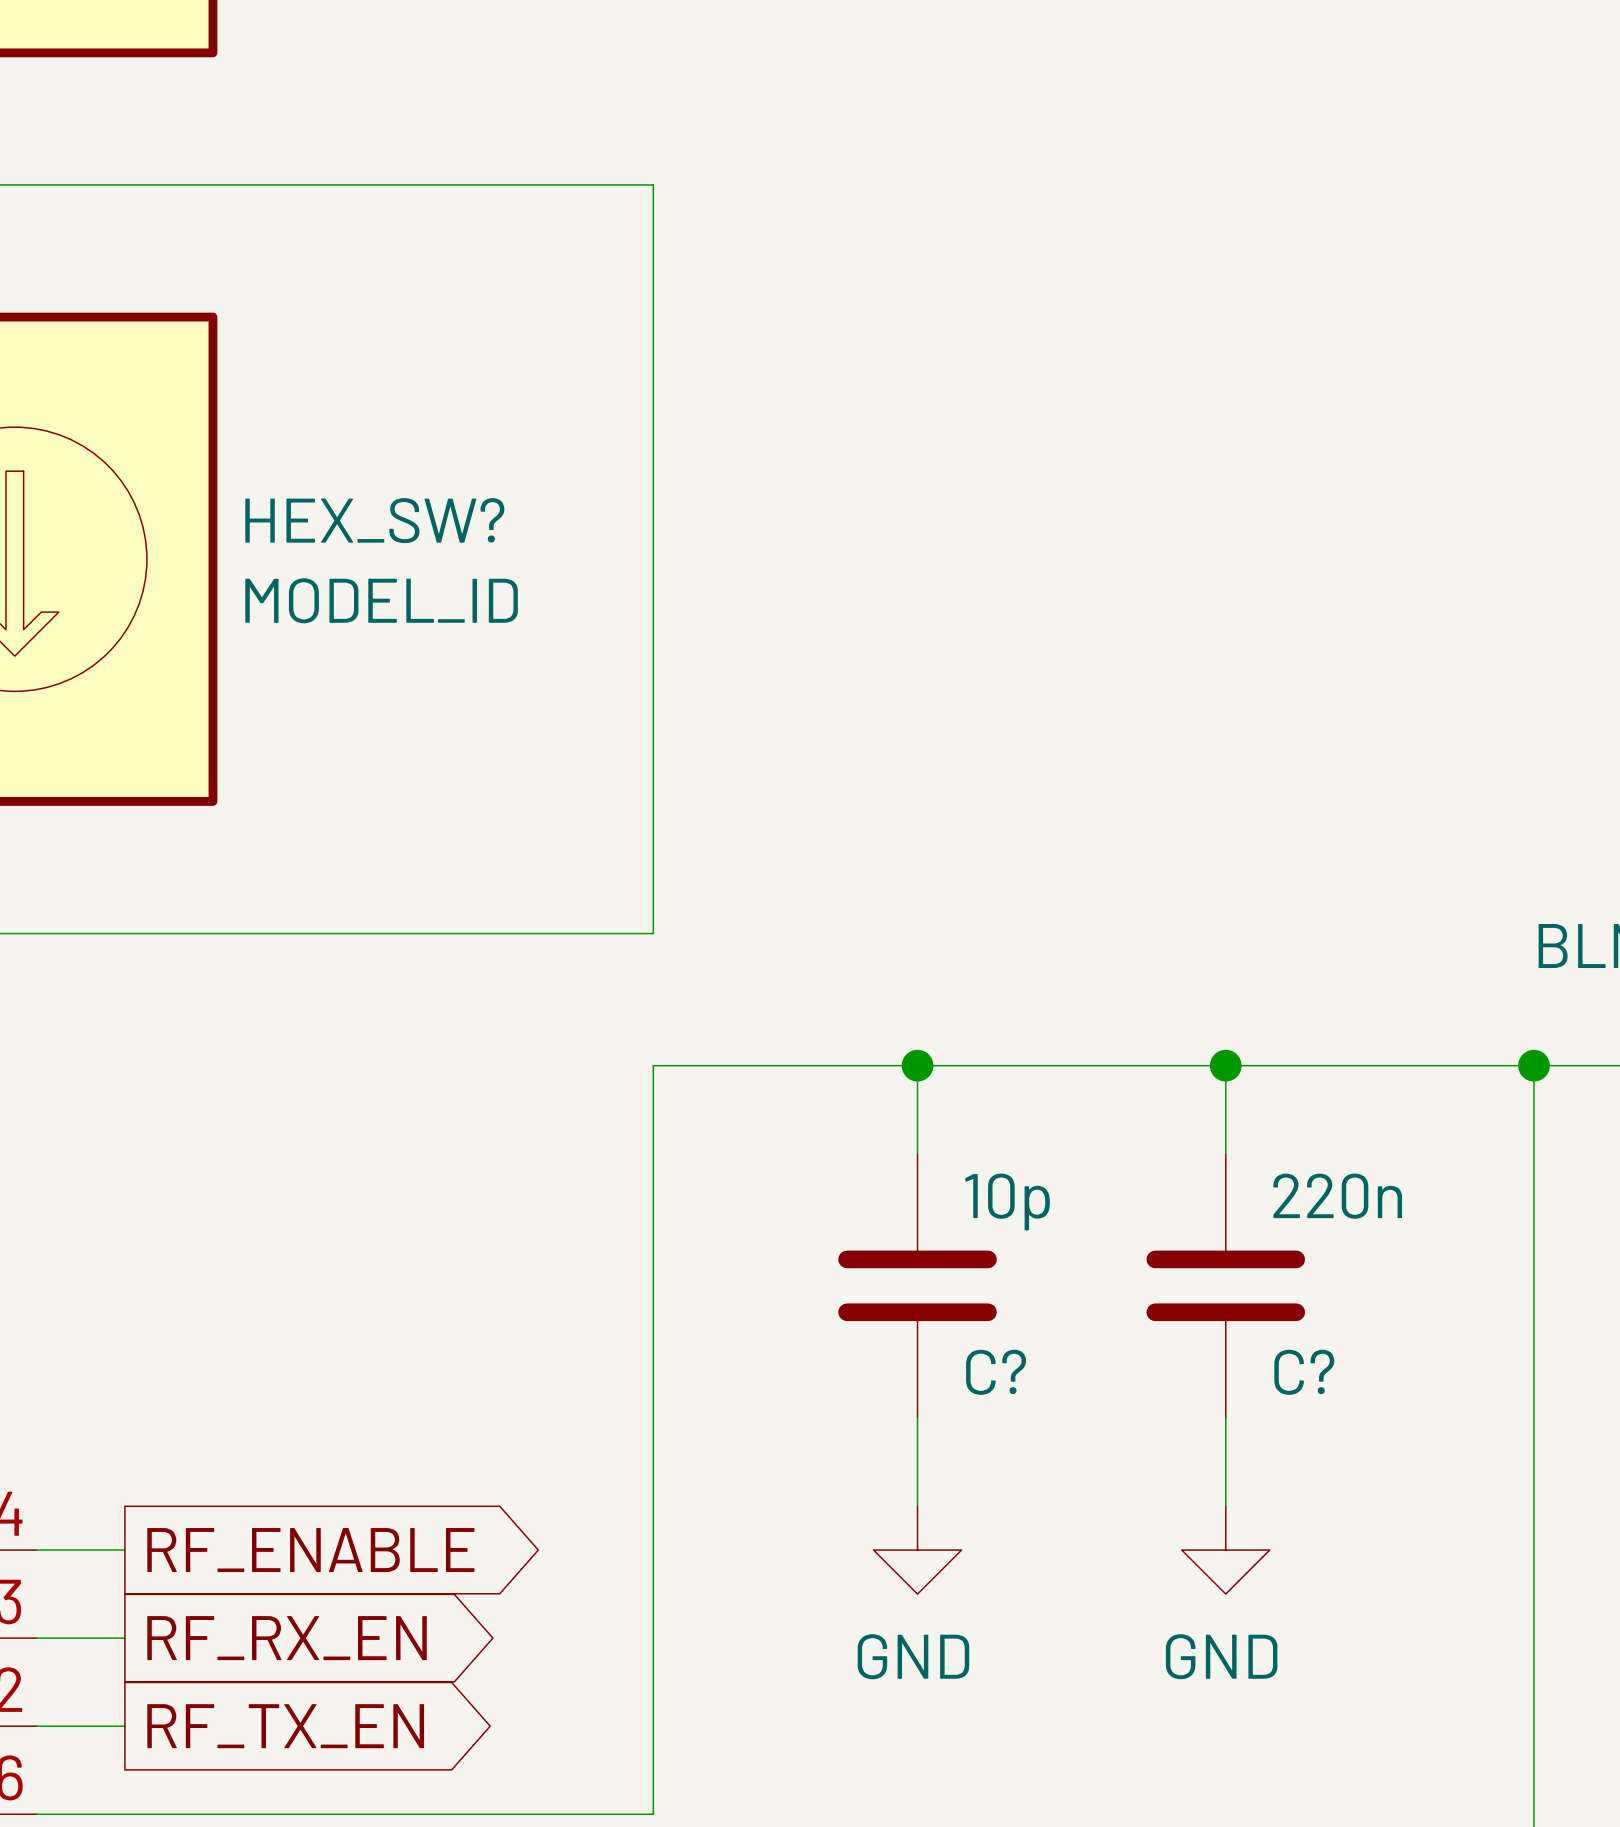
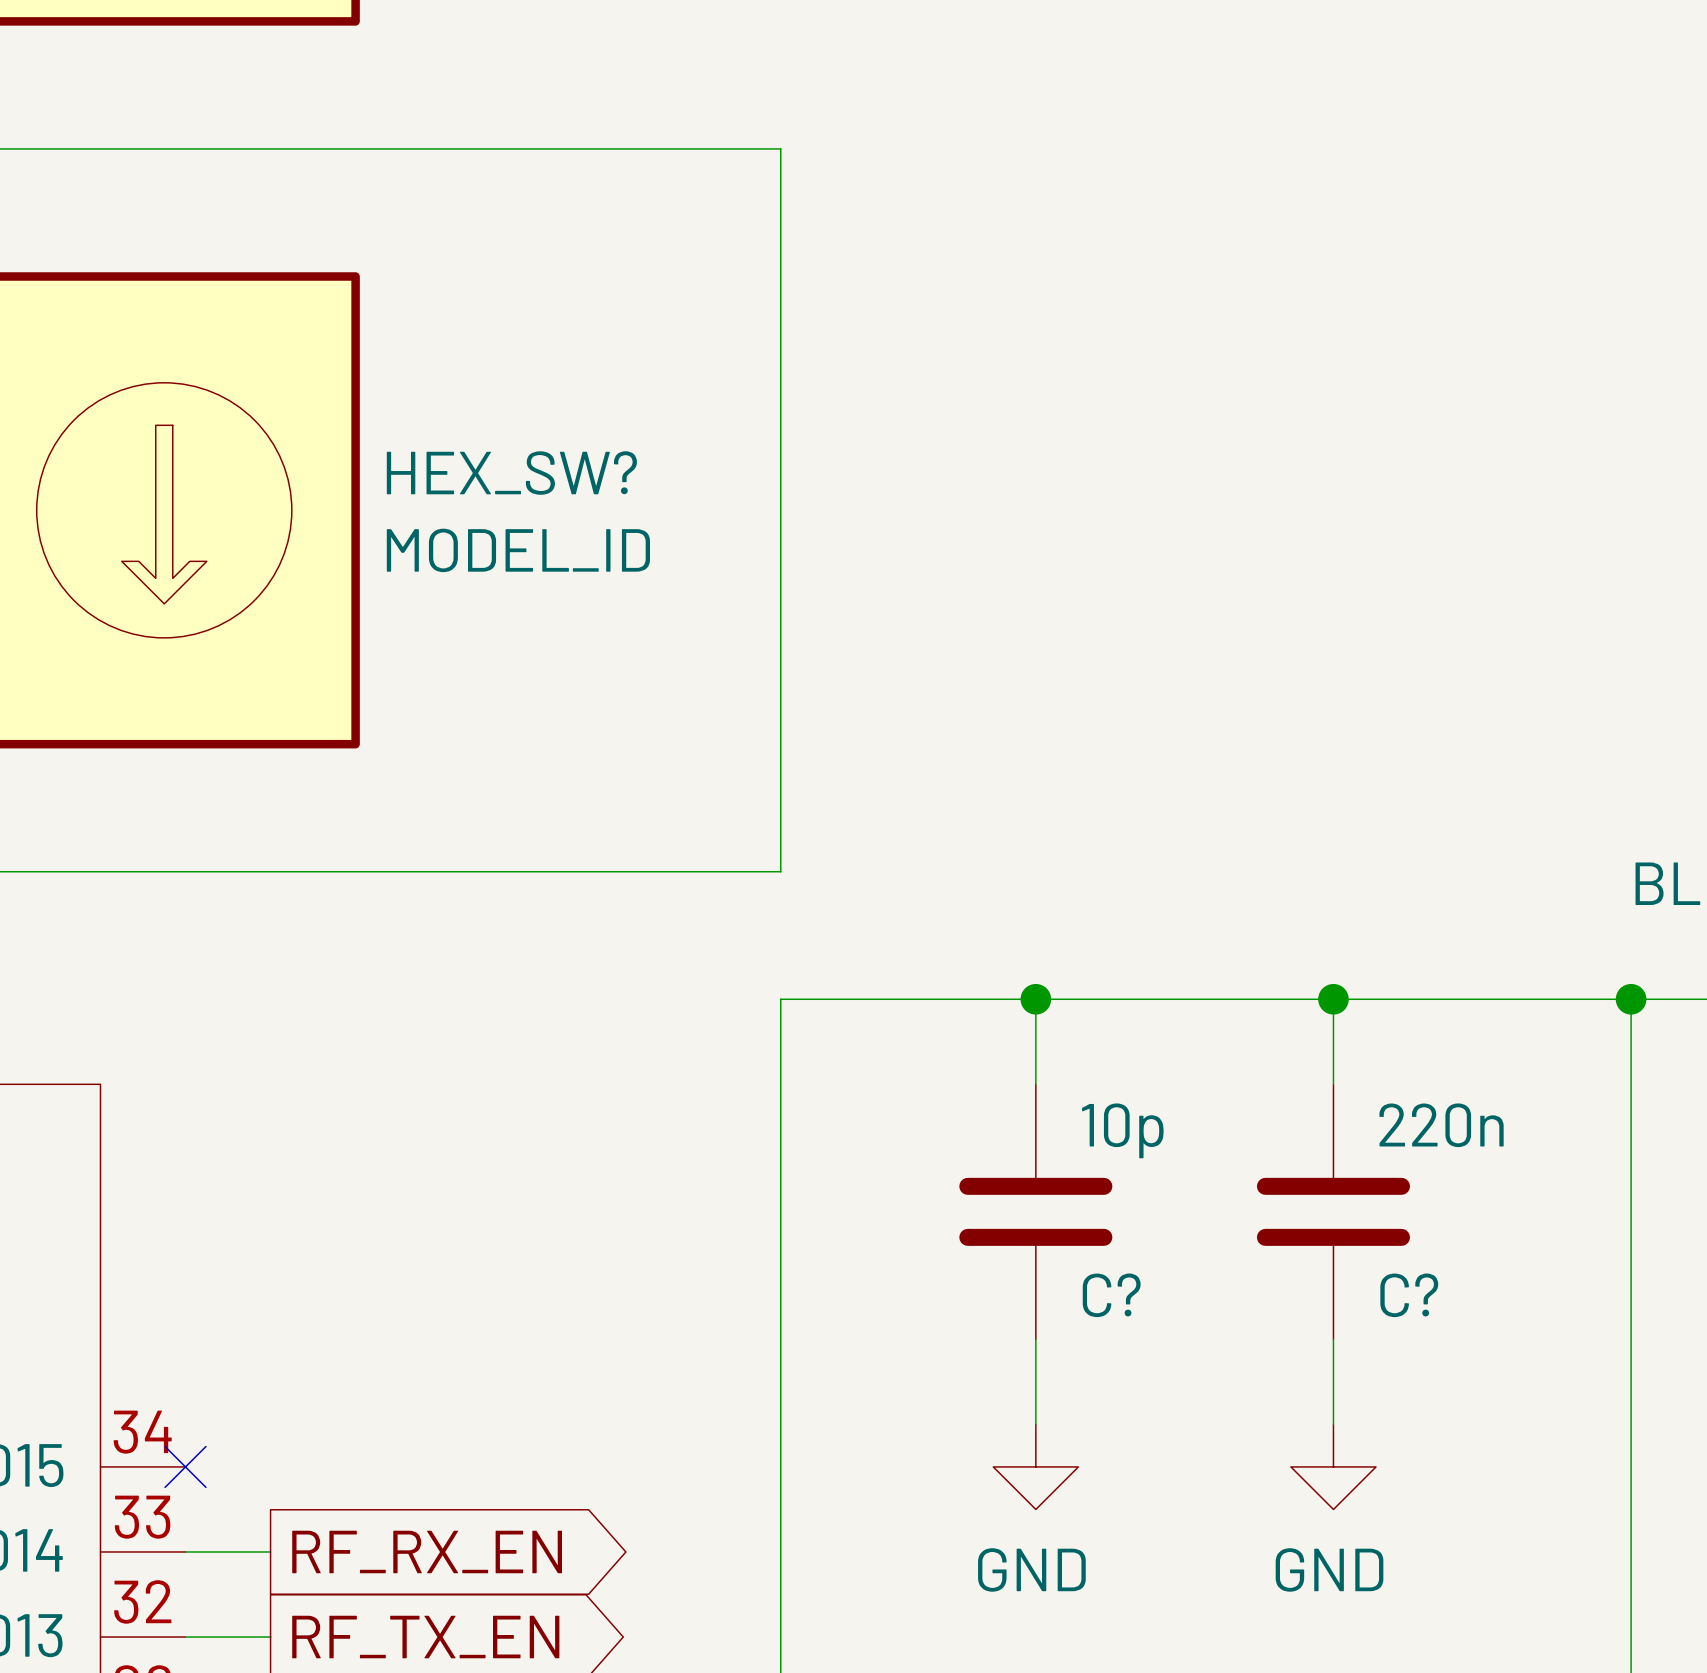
wire: (36, 1550) (124, 1550) -> none
no-connect mark: none -> (185, 1466)
global label: RF_ENABLE (310, 1550) -> none

